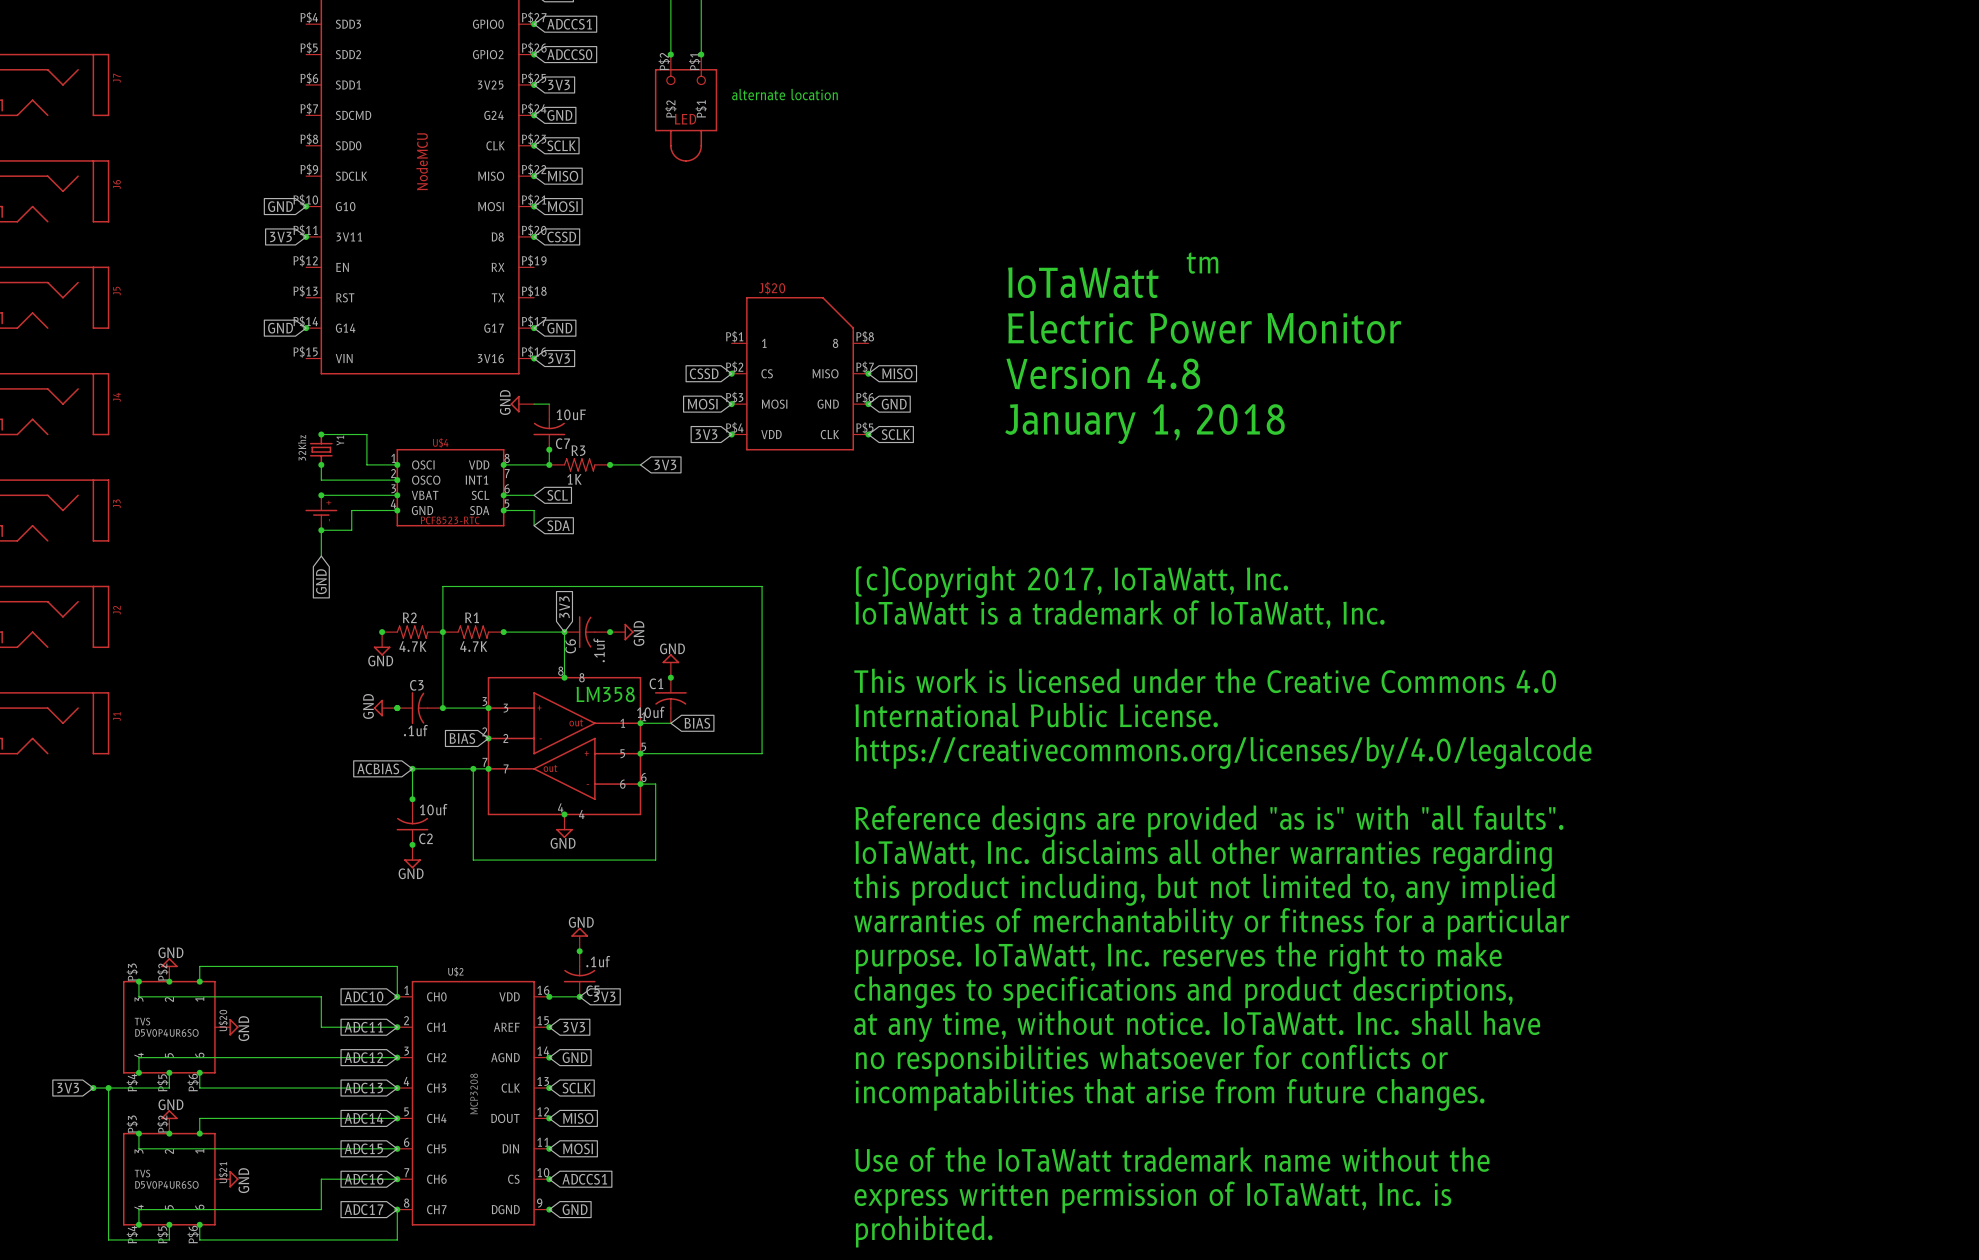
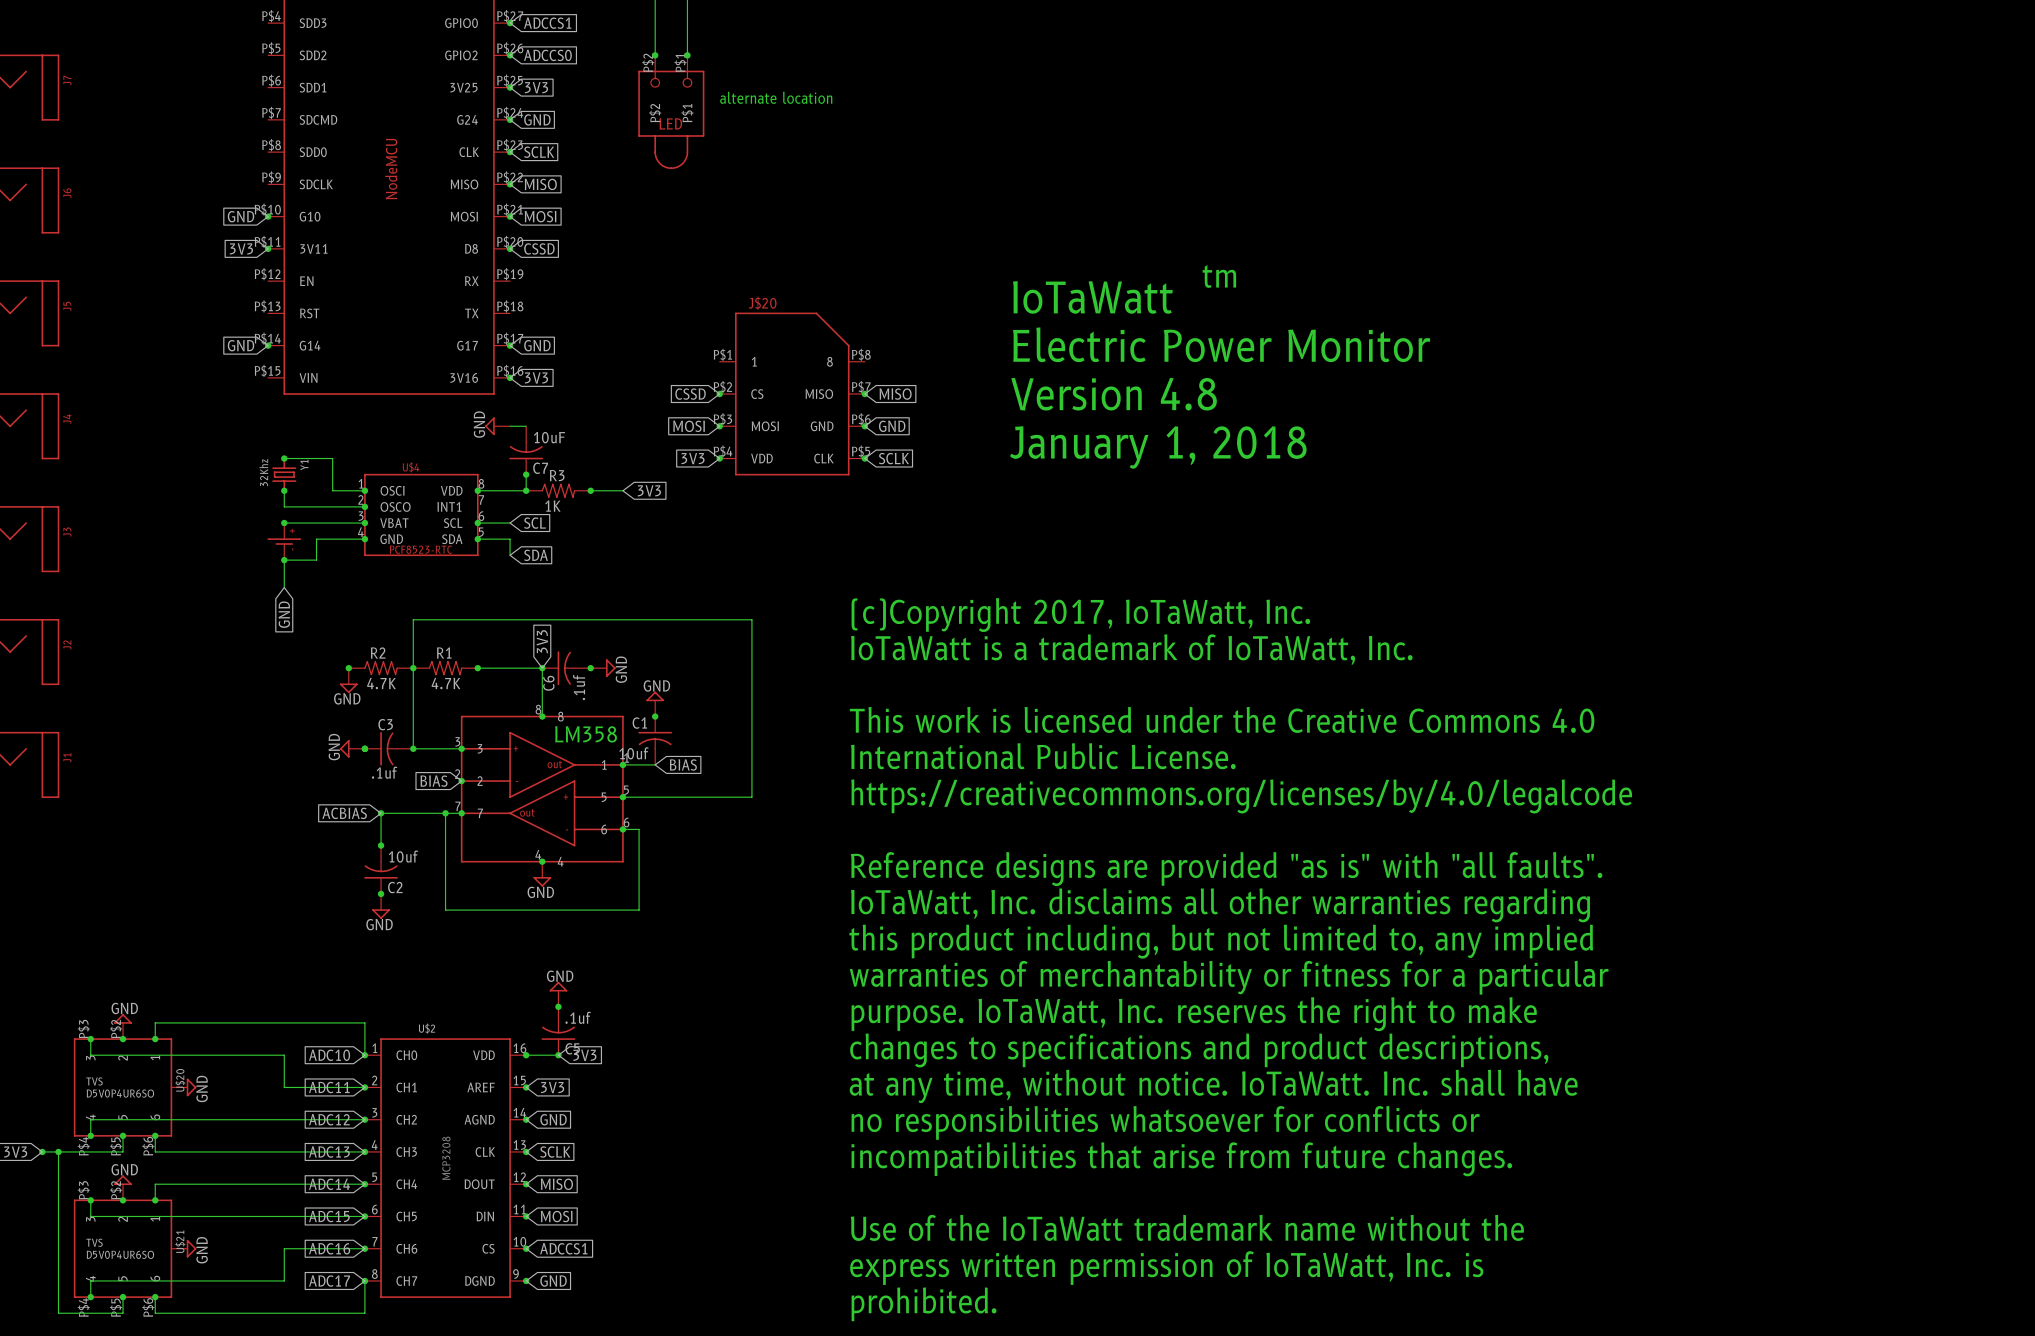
text: incompatabilities that arise from future changes. (1170, 1094) -> incompatibilities that arise from future changes. (1181, 1159)

